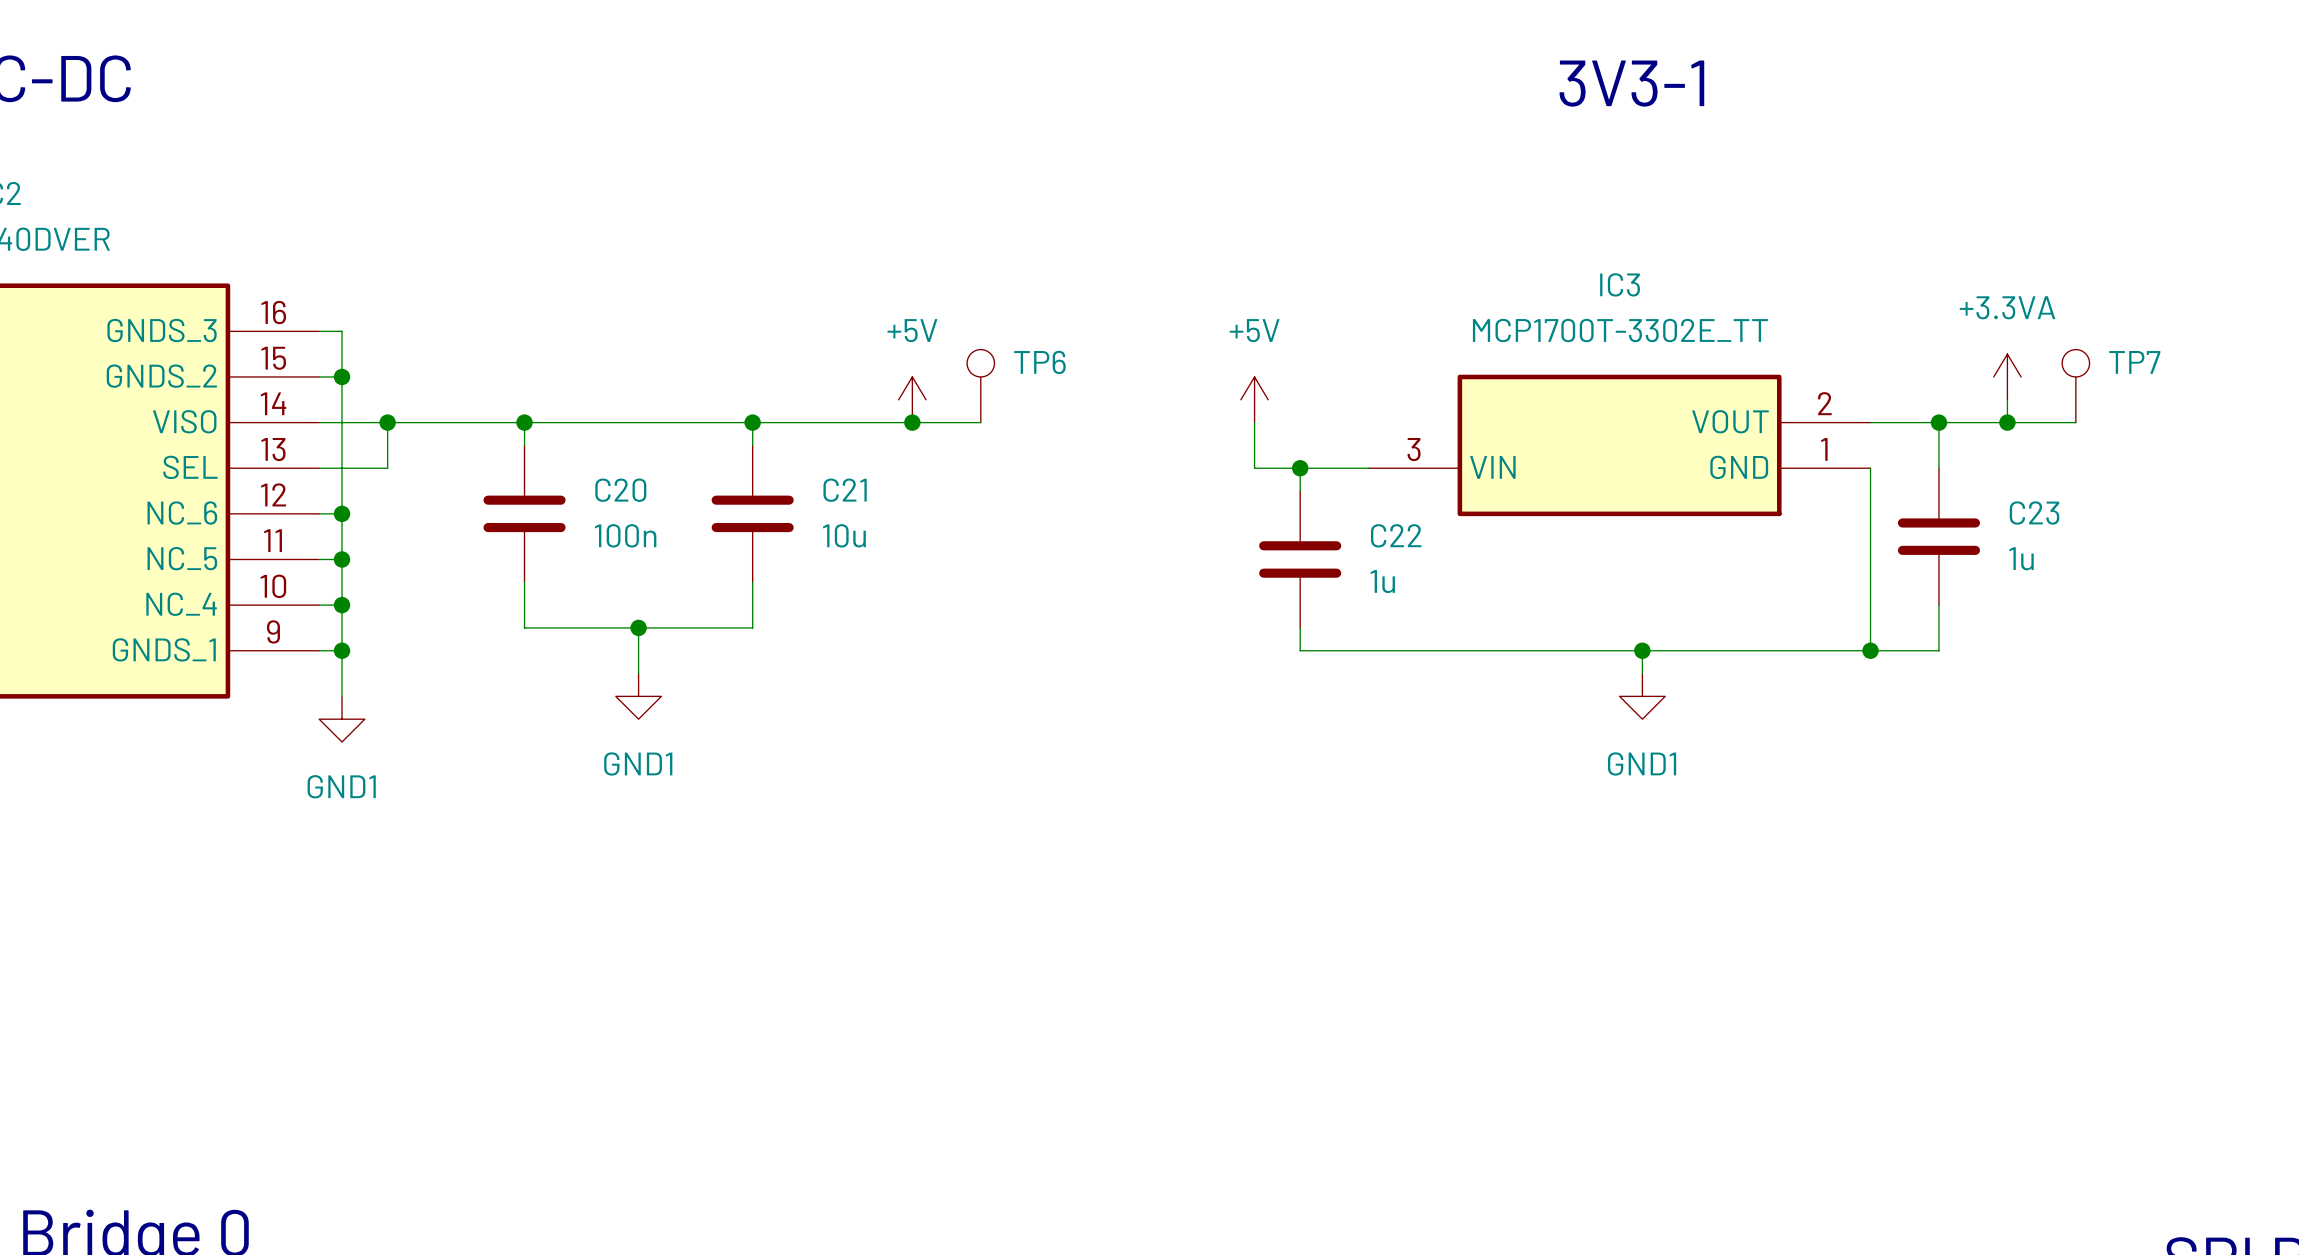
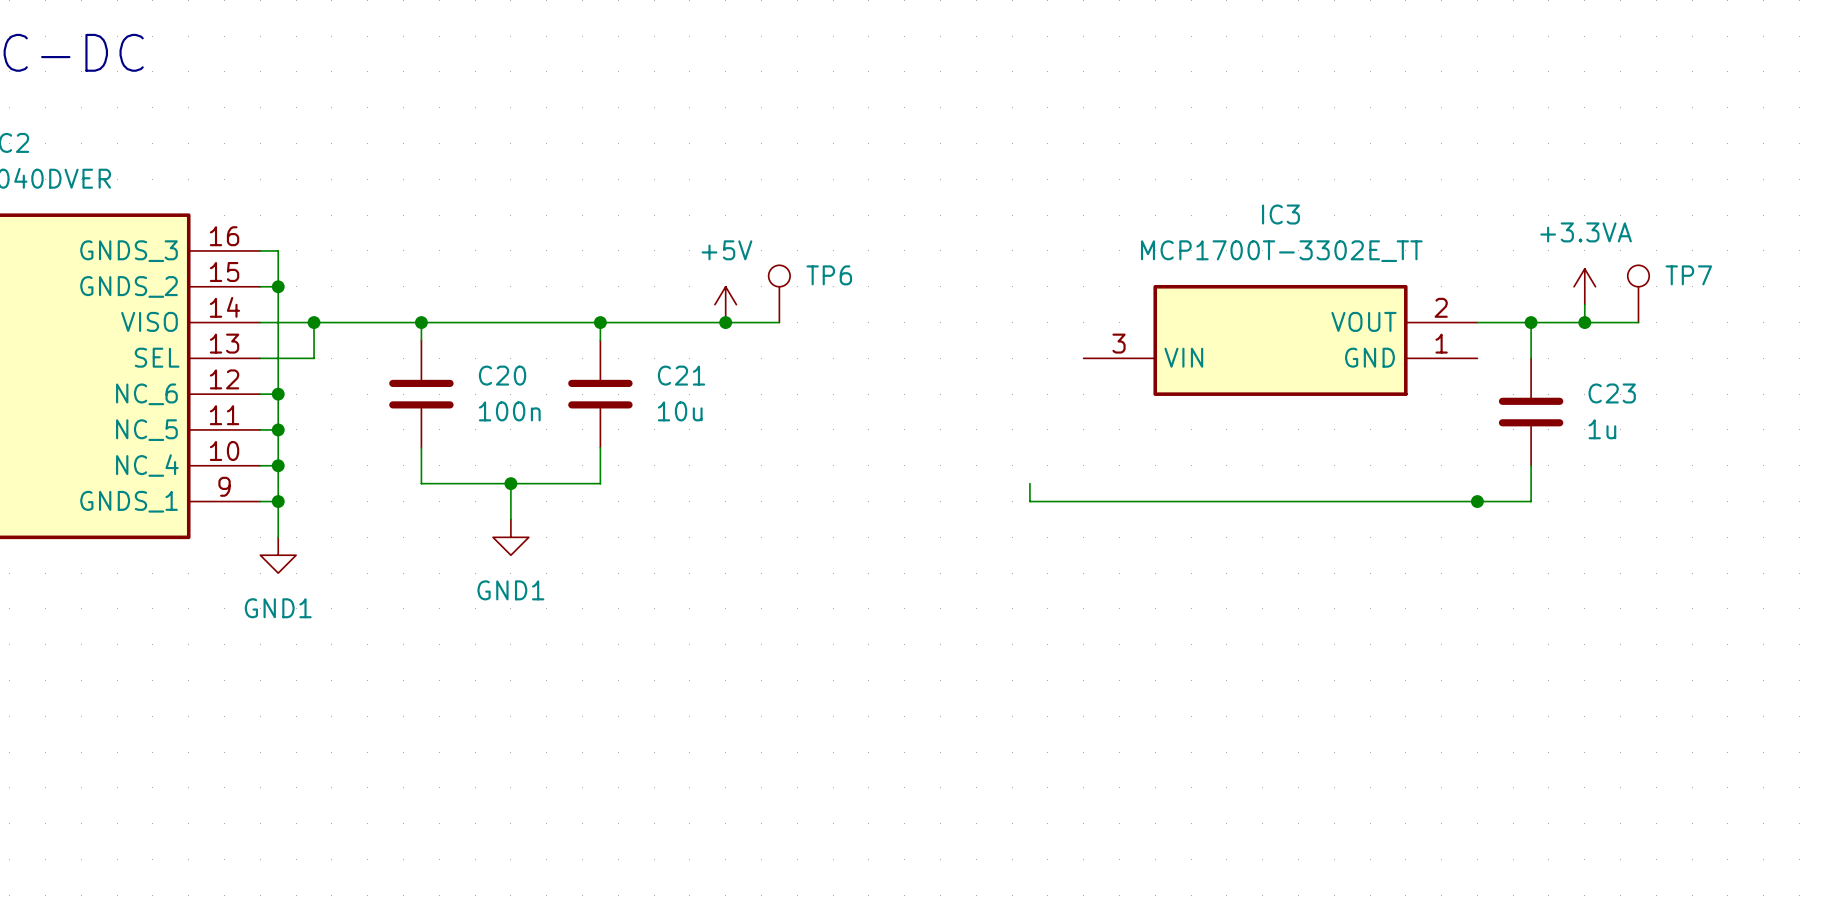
text: 3V3-1 (1631, 83) -> none
power symbol: +5V (1254, 399) -> none
wire: (1254, 422) (1254, 468) (1368, 468) -> none
wire: (1300, 468) (1300, 491) -> none
junction: (1300, 468) -> none
wire: (1870, 468) (1870, 650) -> none
C22: 1u (1300, 559) -> none
wire: (1642, 650) (1642, 673) -> none
junction: (1642, 650) -> none
power symbol: GND1 (1642, 696) -> none

